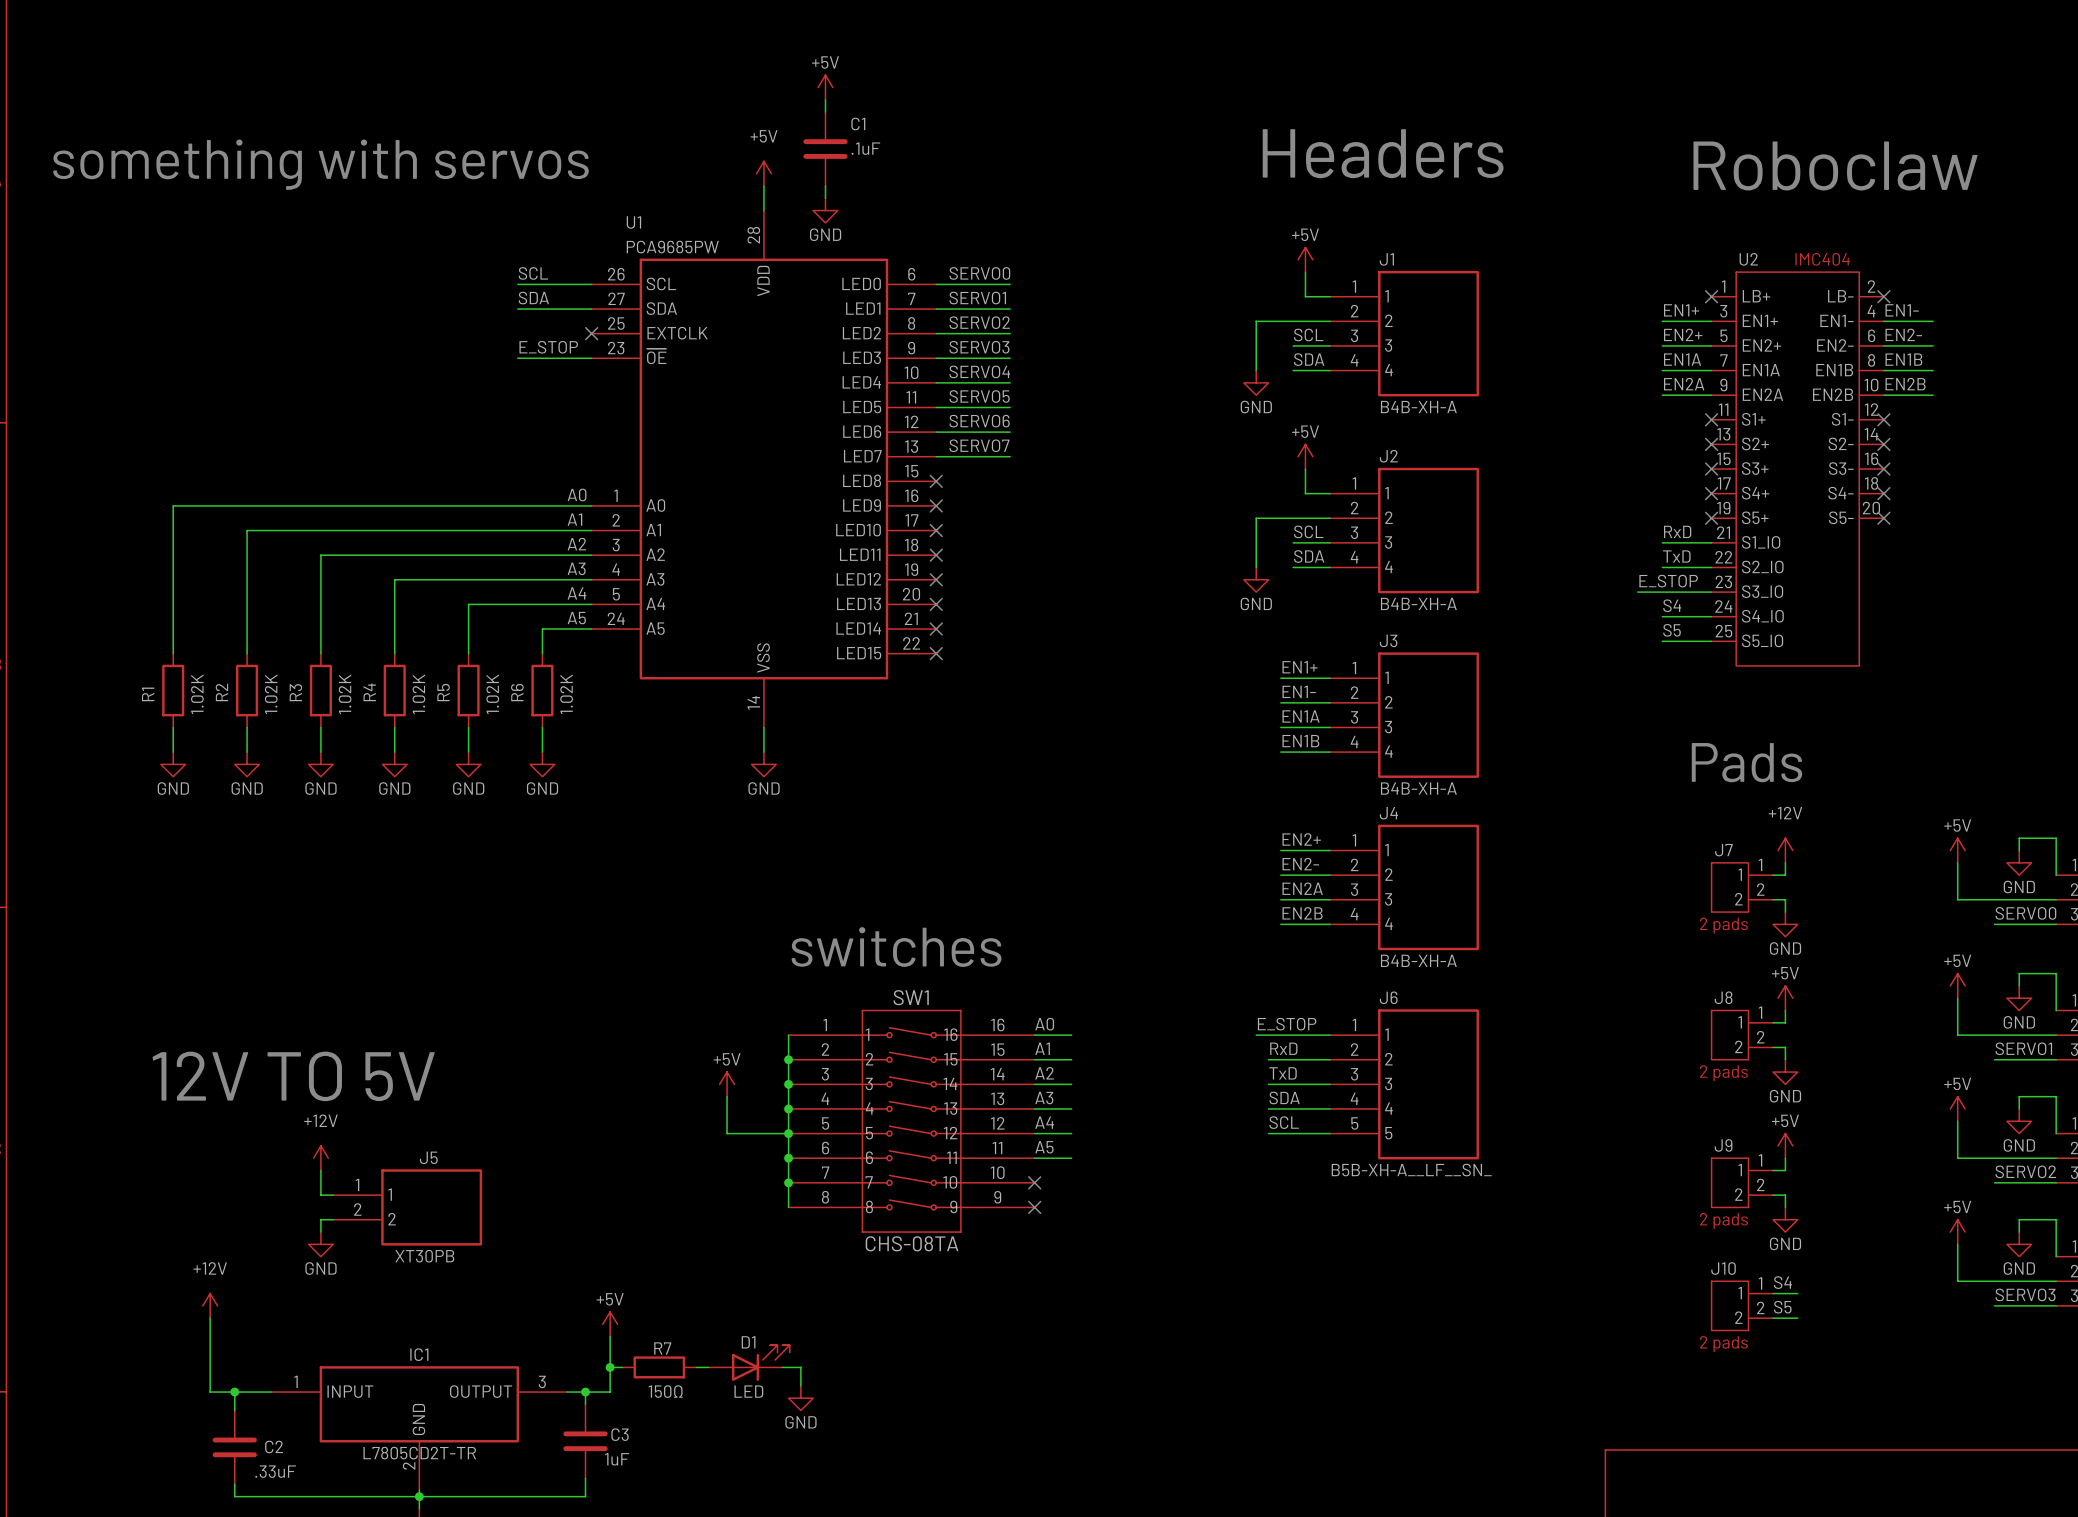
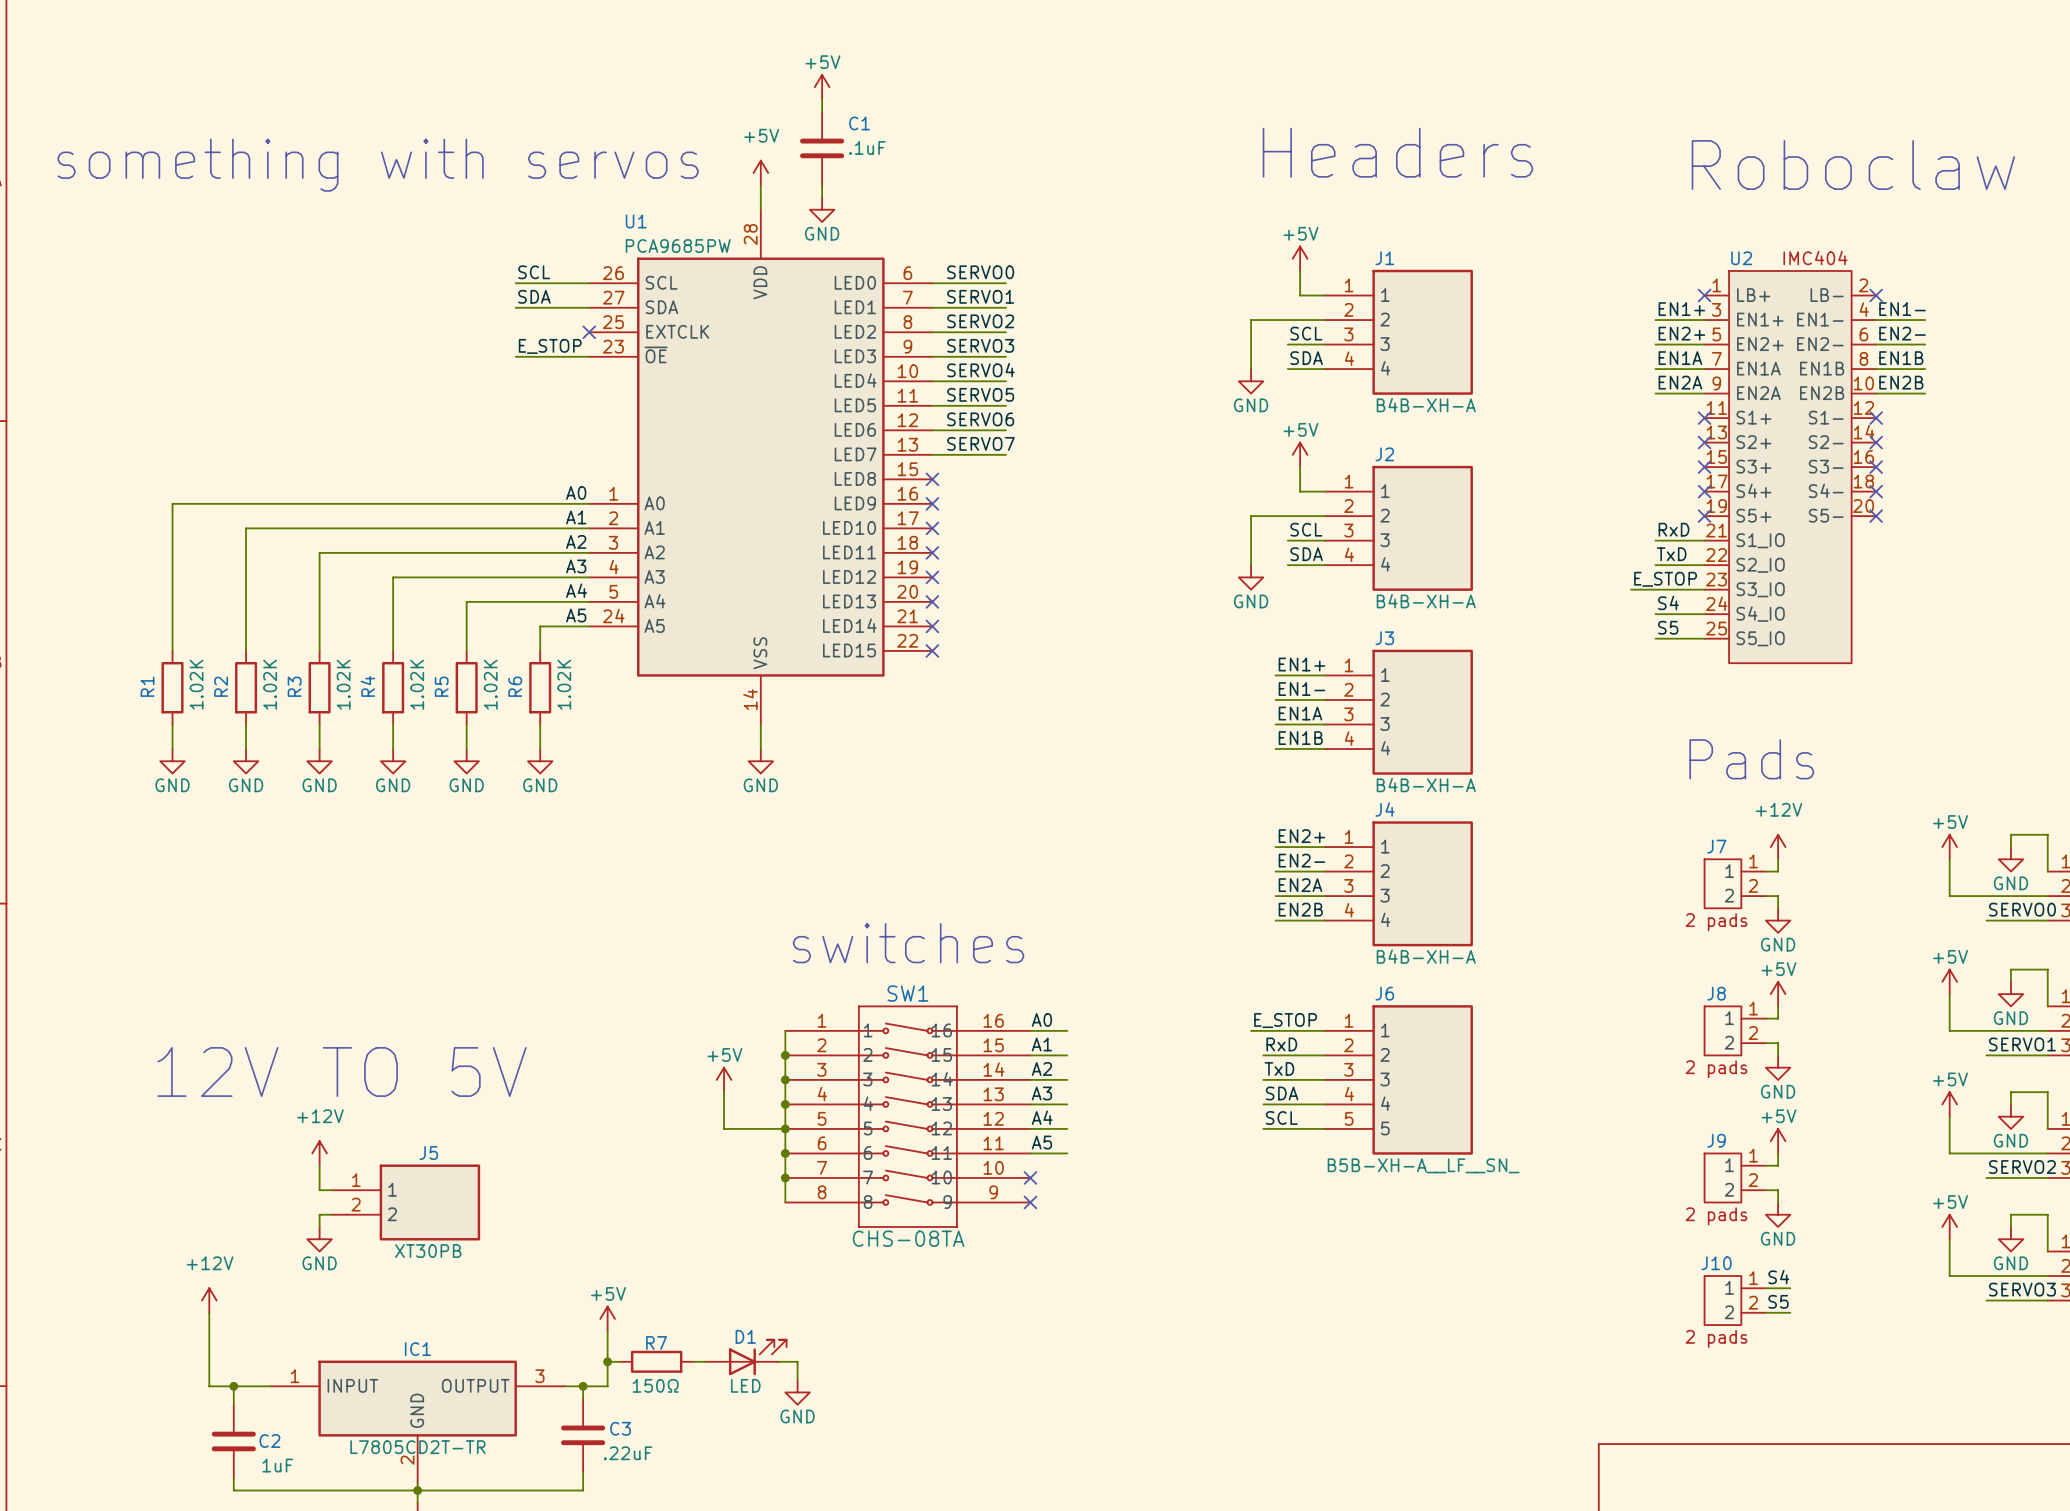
C3 value: 1uF (617, 1459) -> .22uF (628, 1453)
C2 value: .33uF (275, 1471) -> 1uF (277, 1465)

